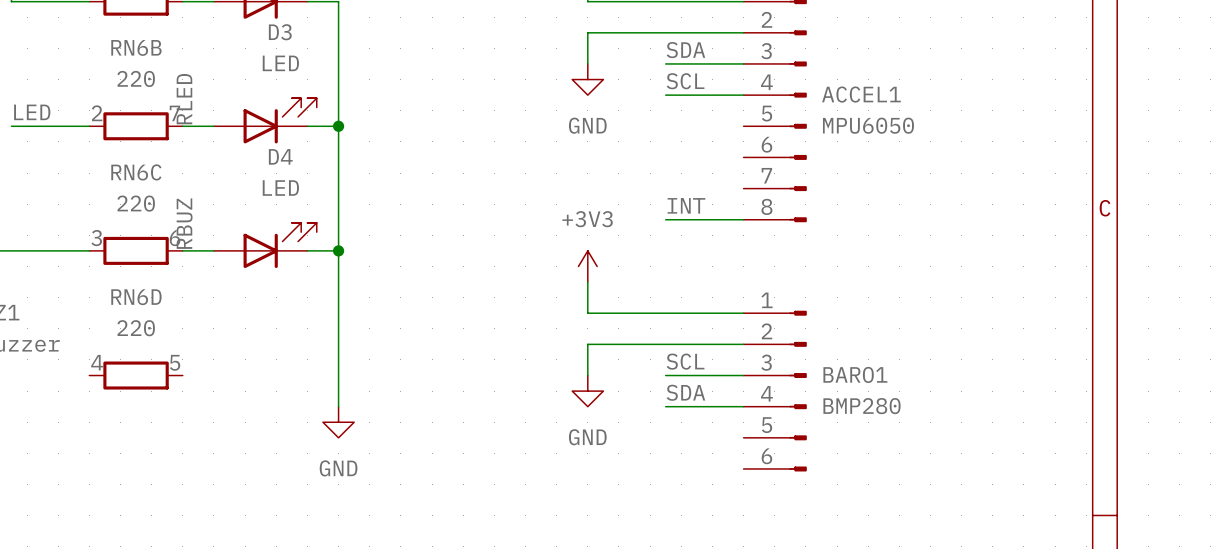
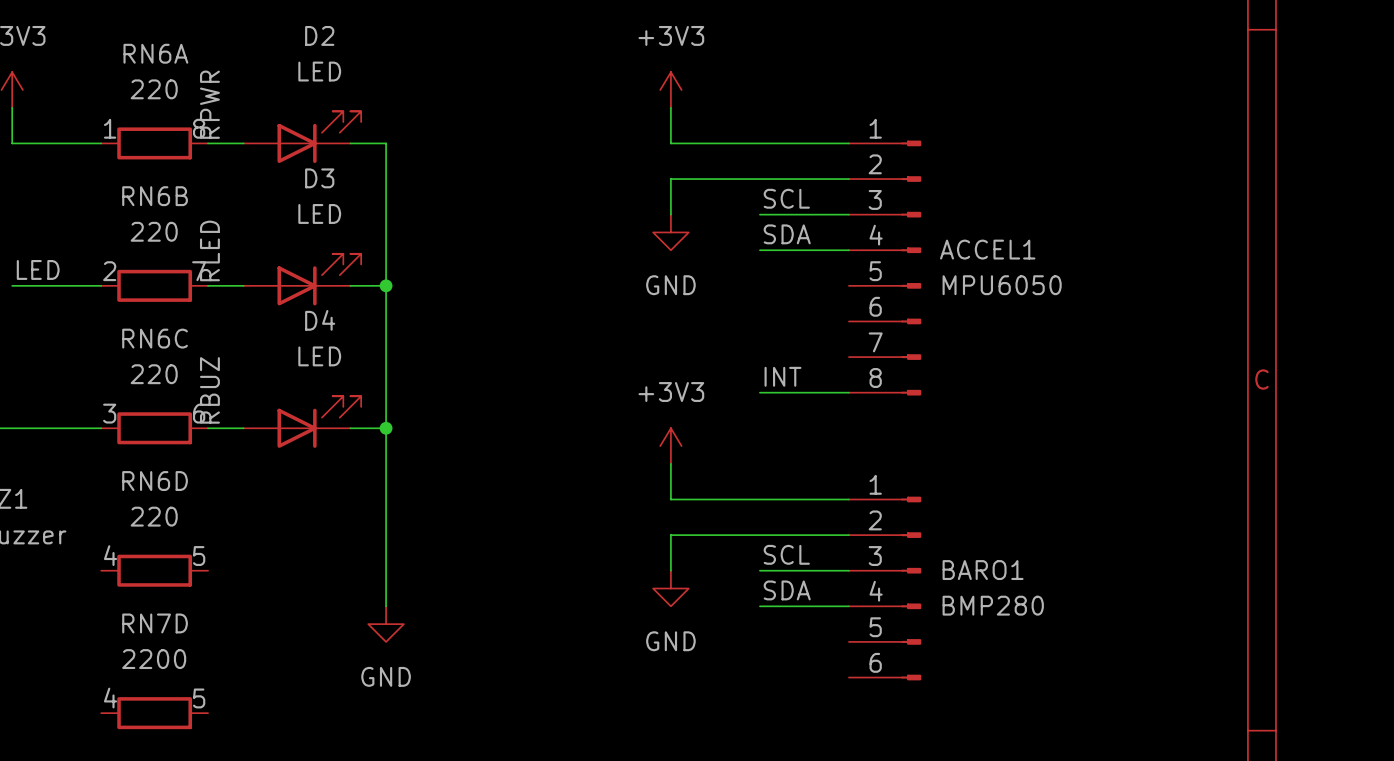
label: SDA (685, 50) -> SCL (786, 198)
label: SCL (685, 81) -> SDA (787, 234)
RN7D: none -> 2200 (154, 713)

